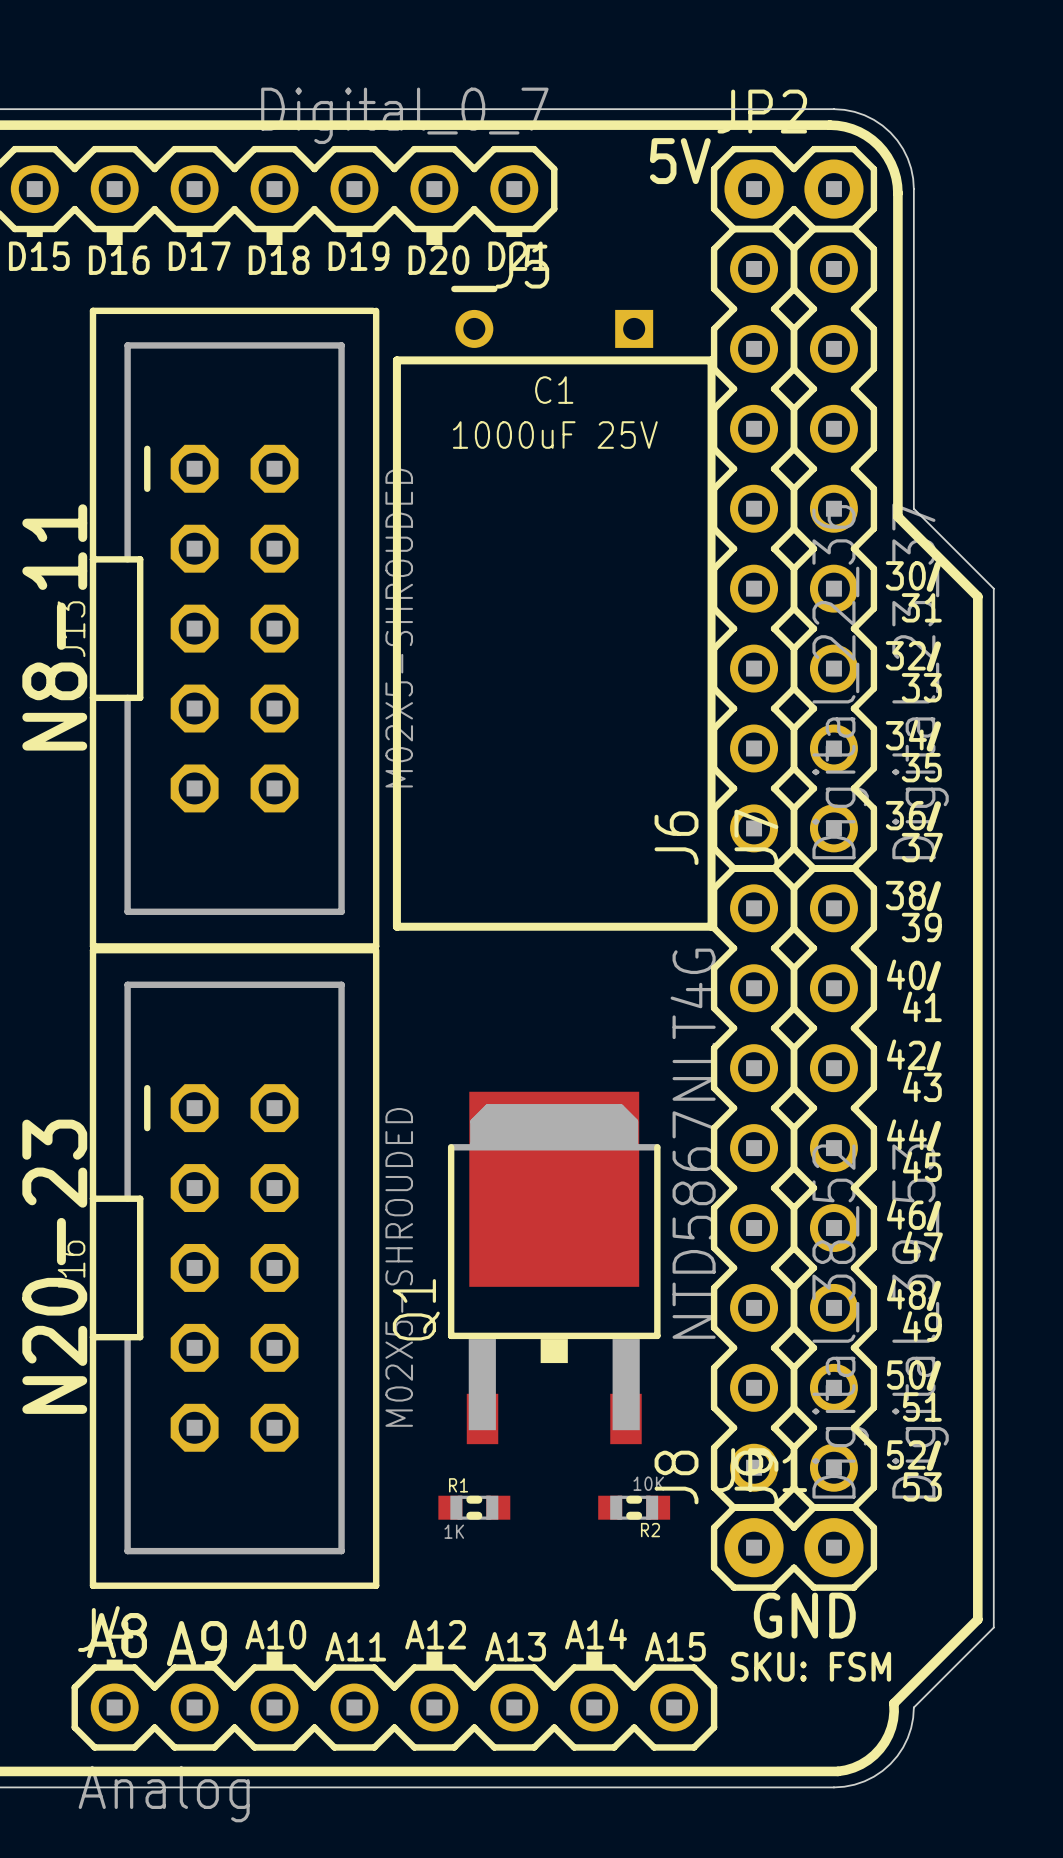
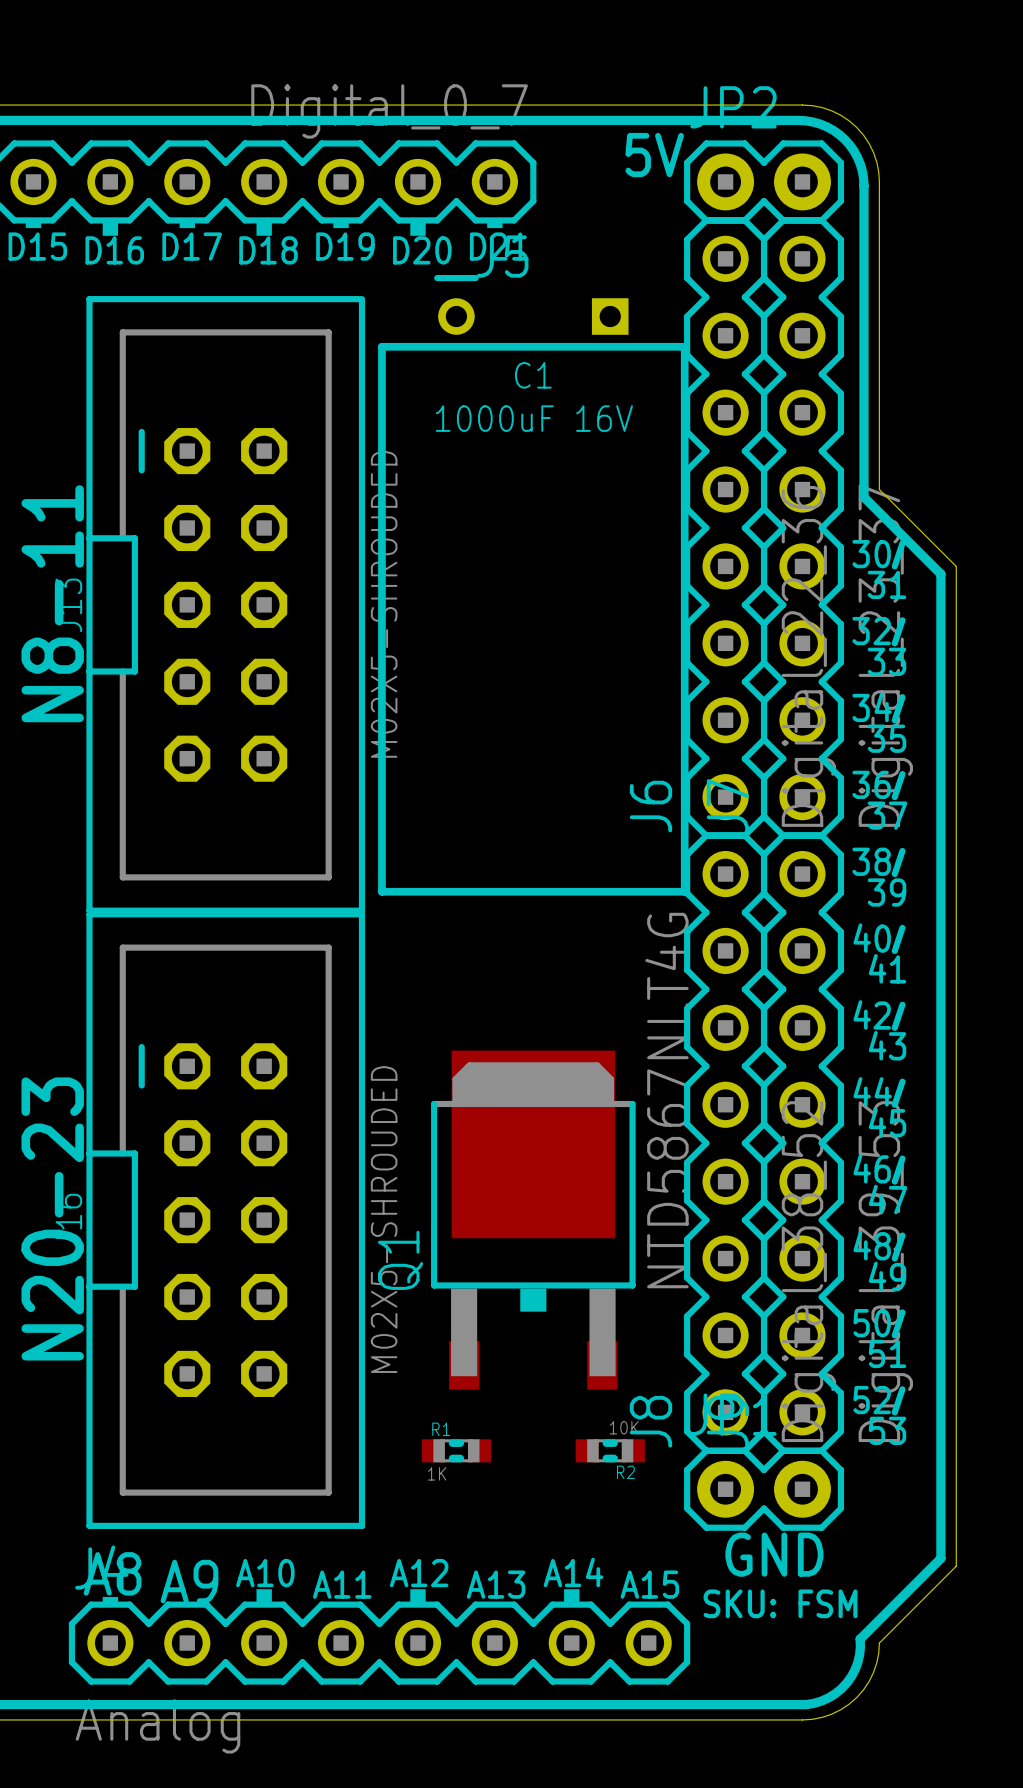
C1 value: 1000uF 25V (555, 435) -> 1000uF 16V (534, 418)

